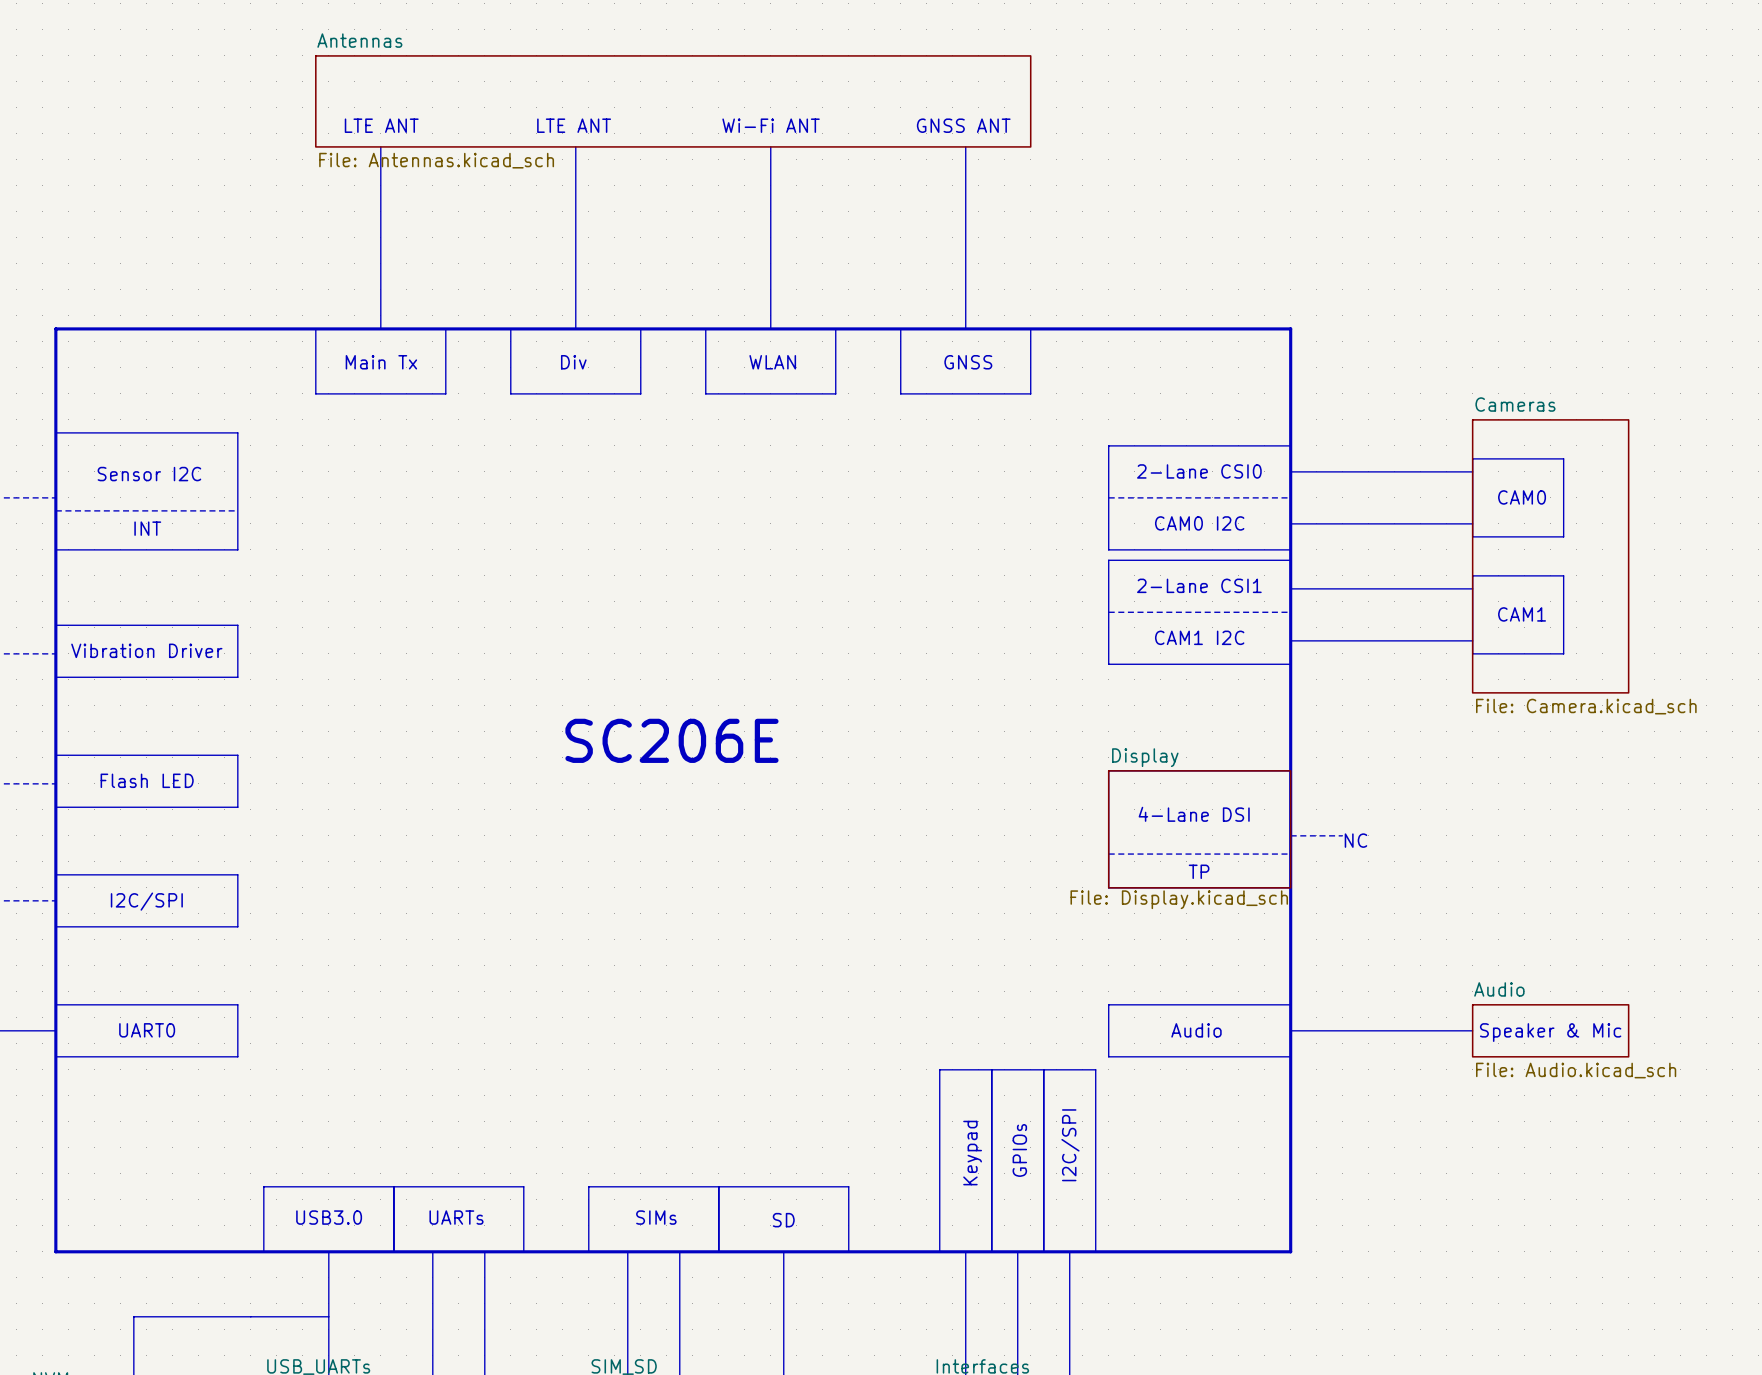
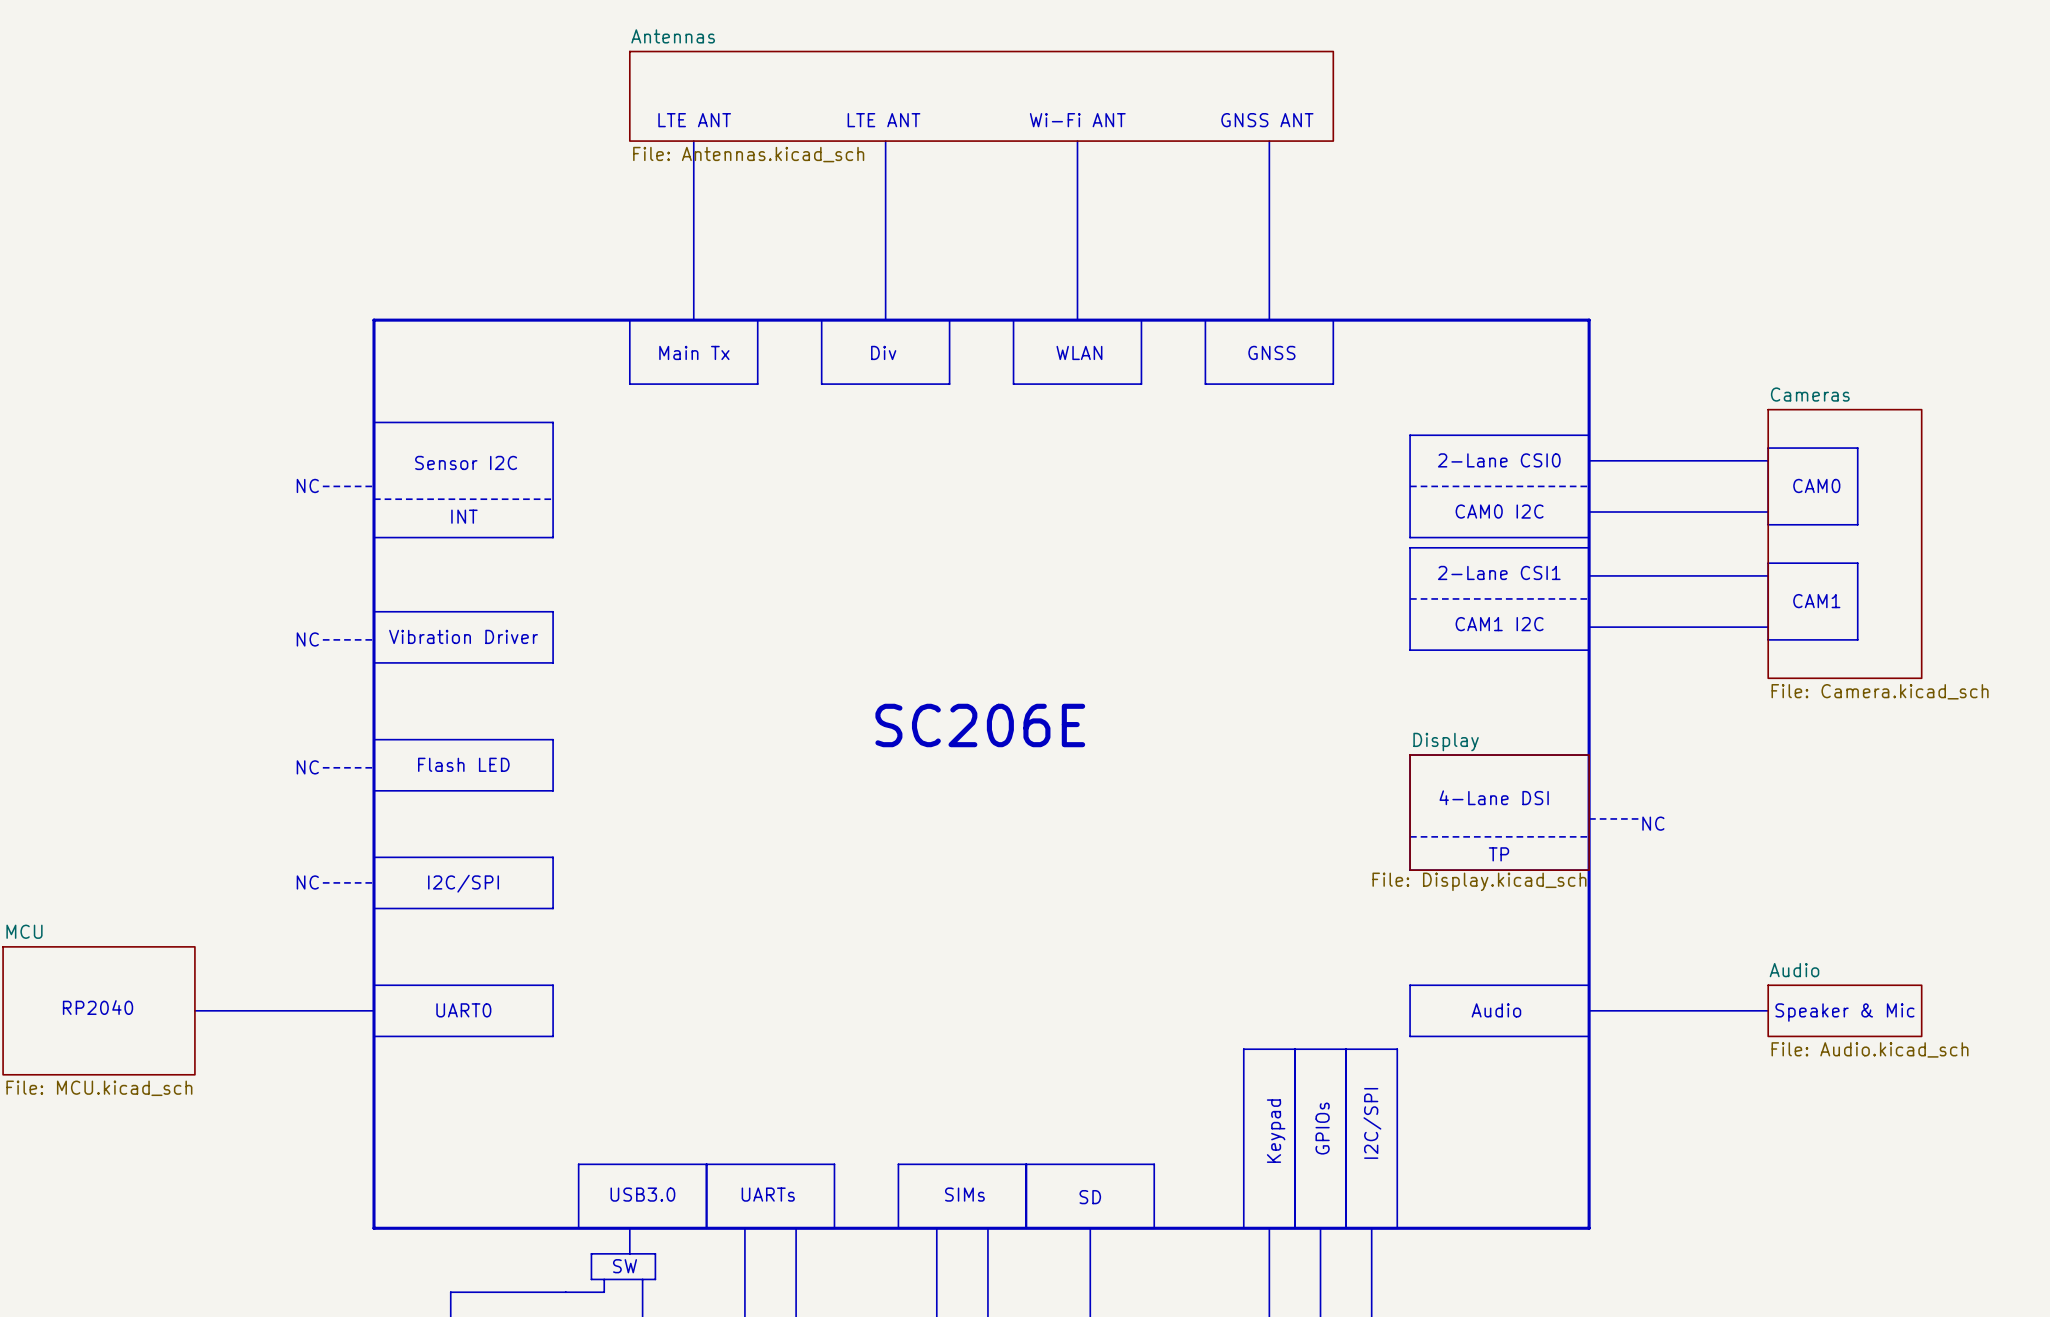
line: none -> (629, 1228) (629, 1253)
line: (328, 1251) (328, 1303) -> none
line: none -> (591, 1253) (655, 1253) (655, 1279) (591, 1279) (591, 1253)
text: none -> SW (625, 1266)
line: (289, 1316) (328, 1316) -> (604, 1292) (604, 1279)

